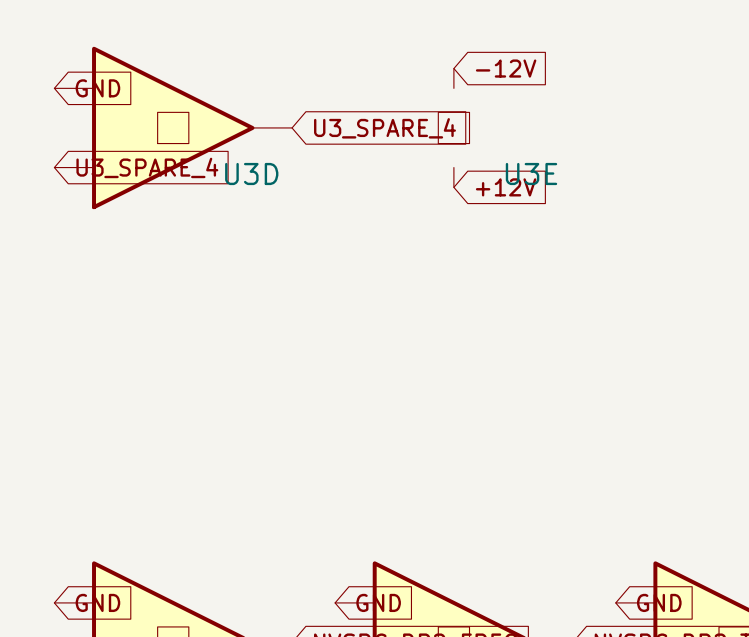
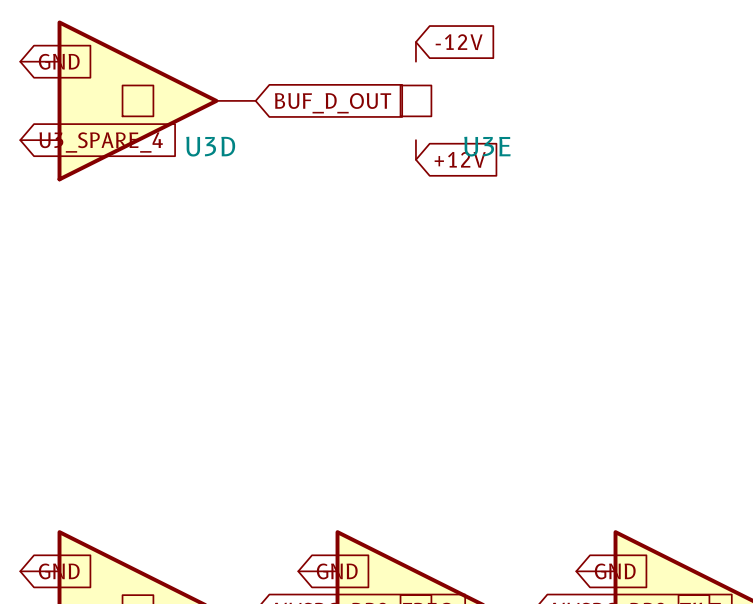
global label: U3_SPARE_4 (384, 128) -> BUF_D_OUT (333, 103)

